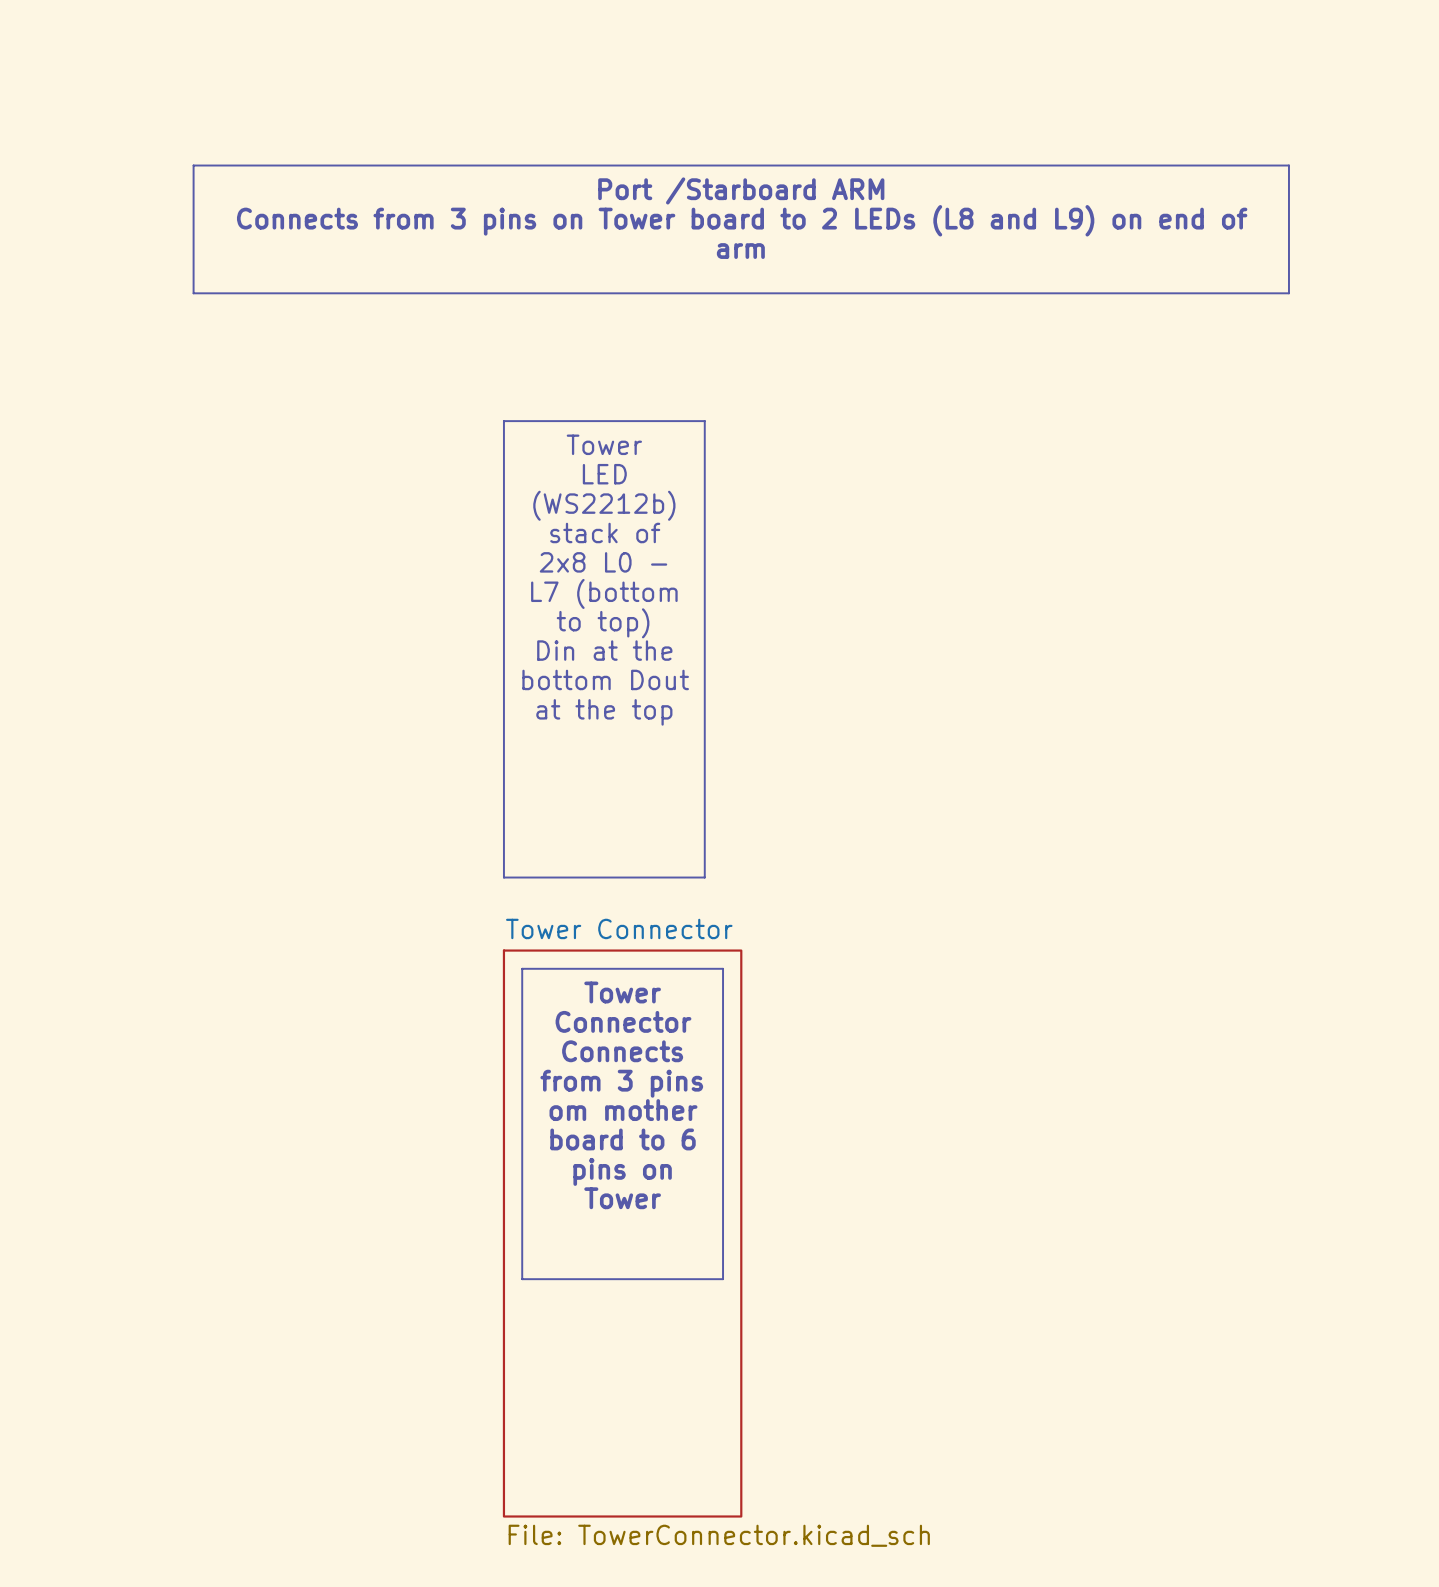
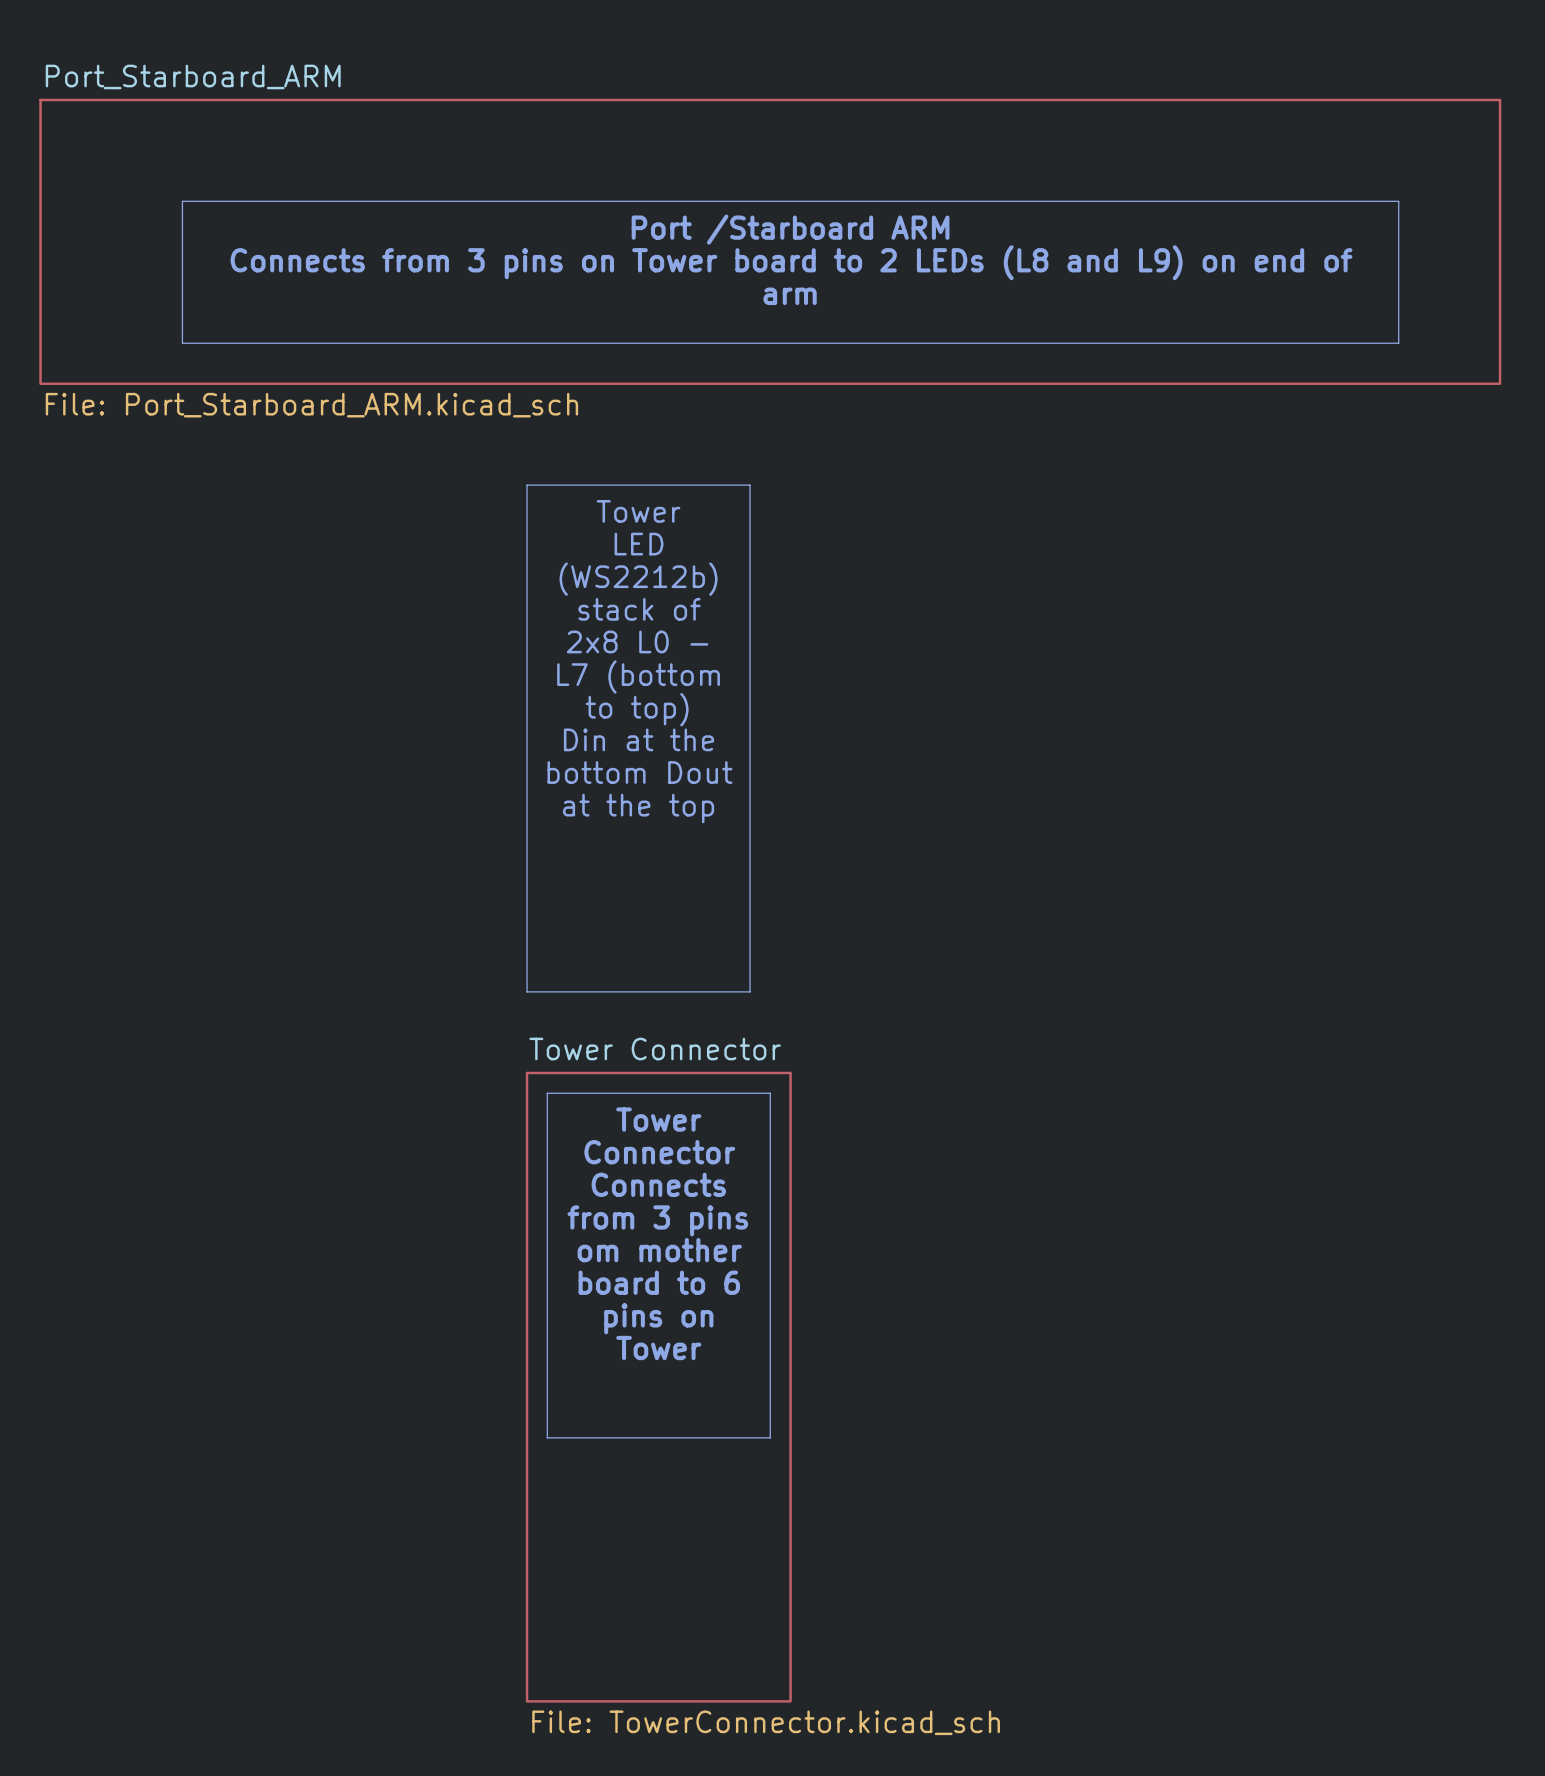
sheet Port_Starboard_ARM: none -> File: Port_Starboard_ARM.kicad_sch (770, 241)

